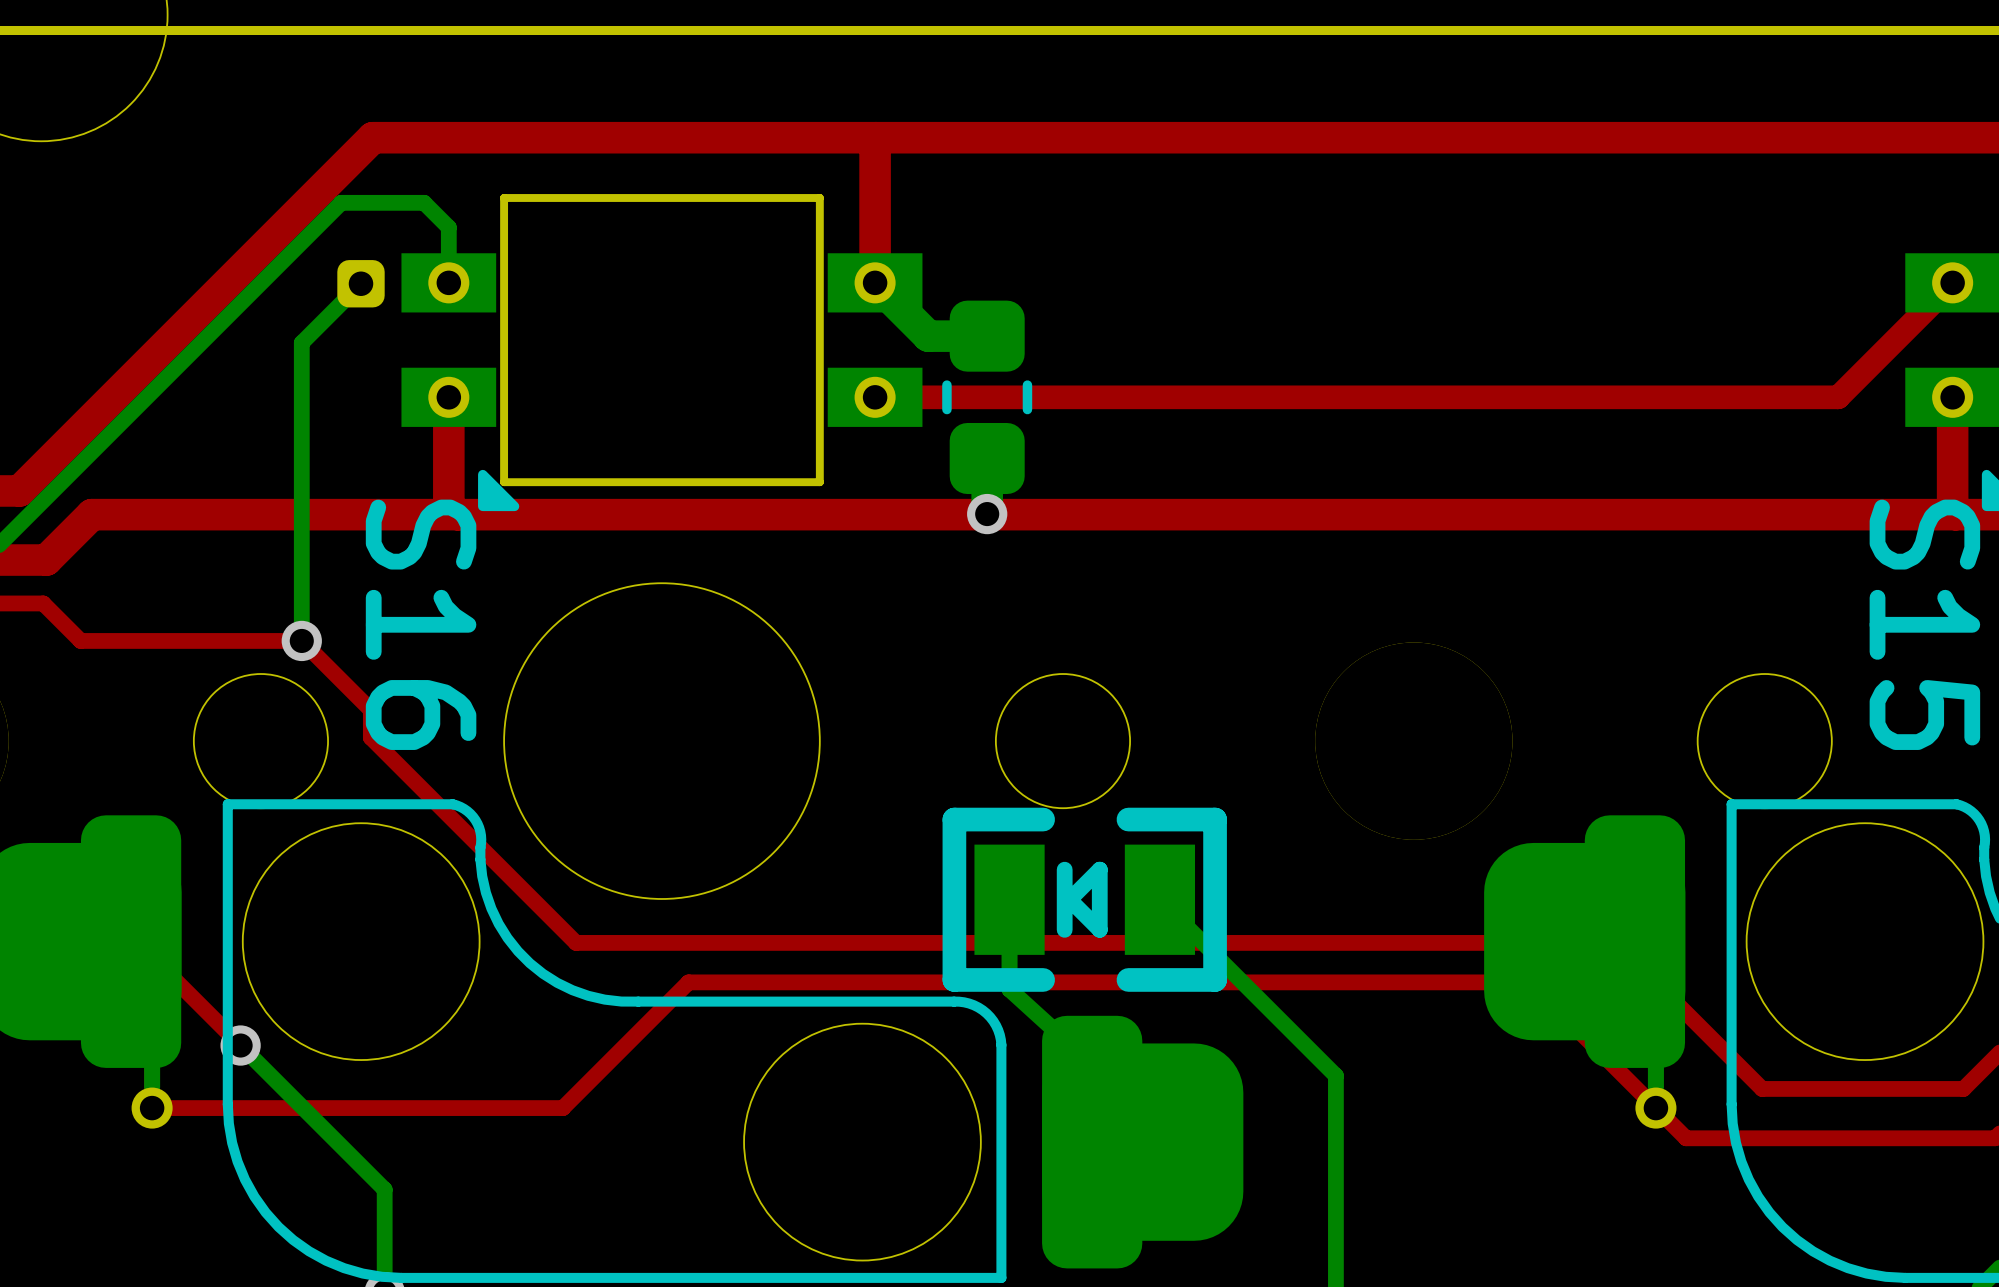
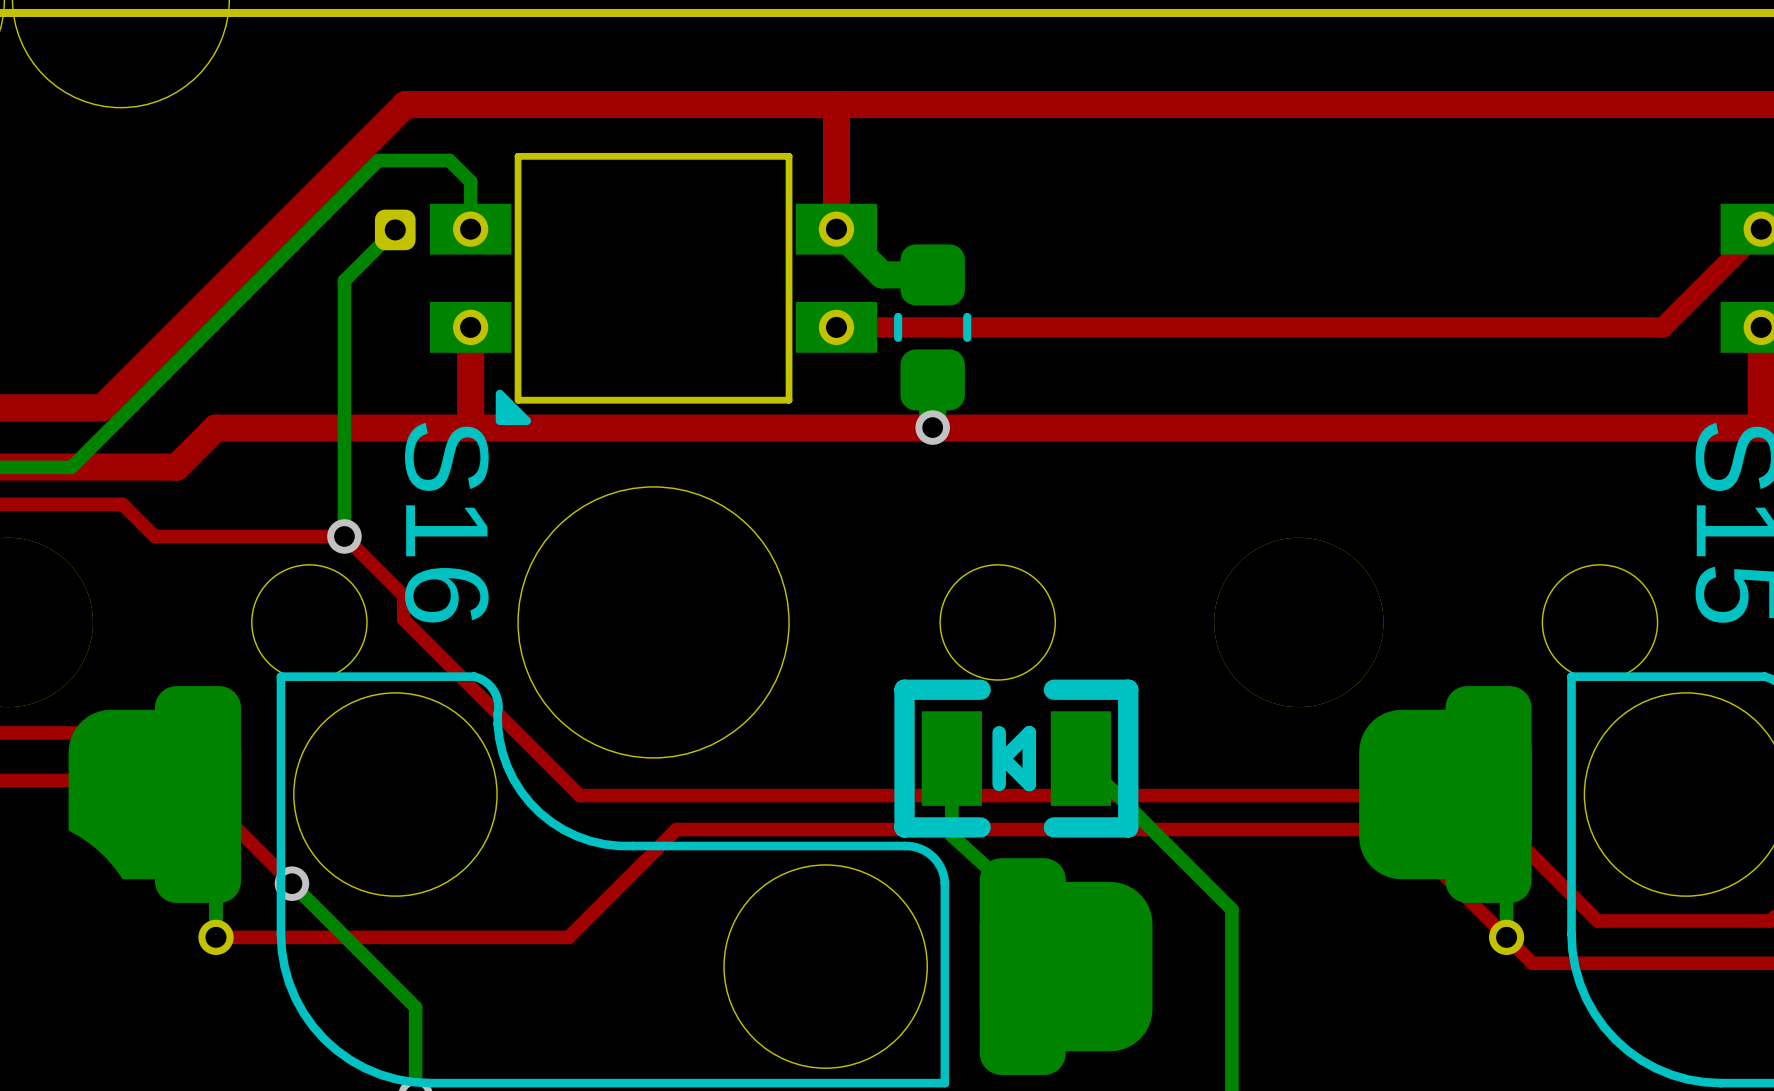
top track: (151, 514) (91, 514) (46, 560) -> (215, 428) (176, 467) (125, 467)

